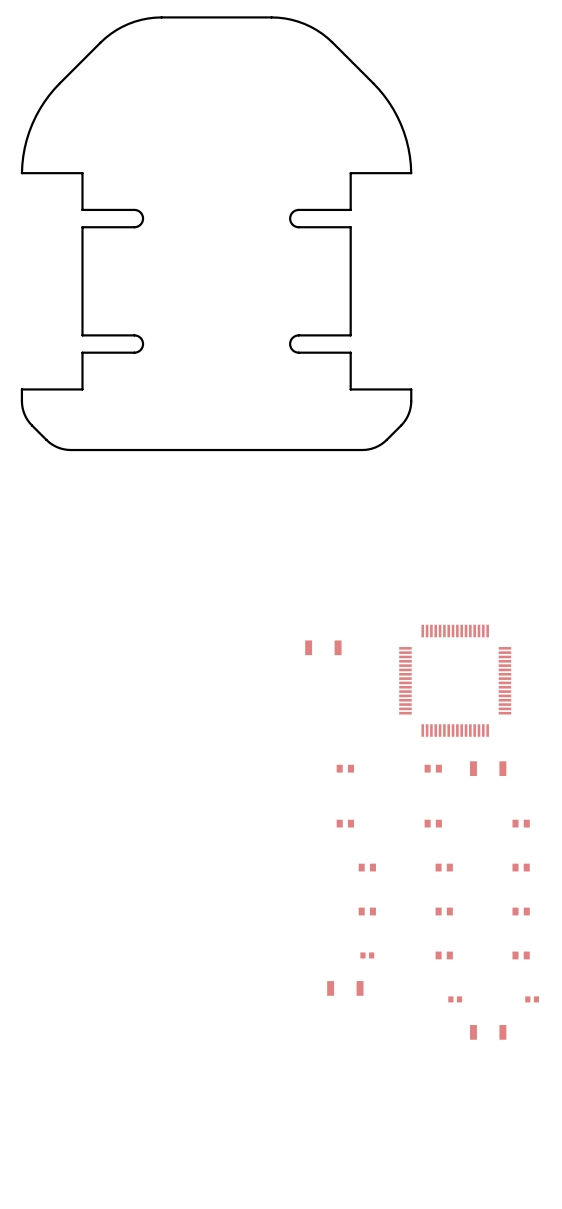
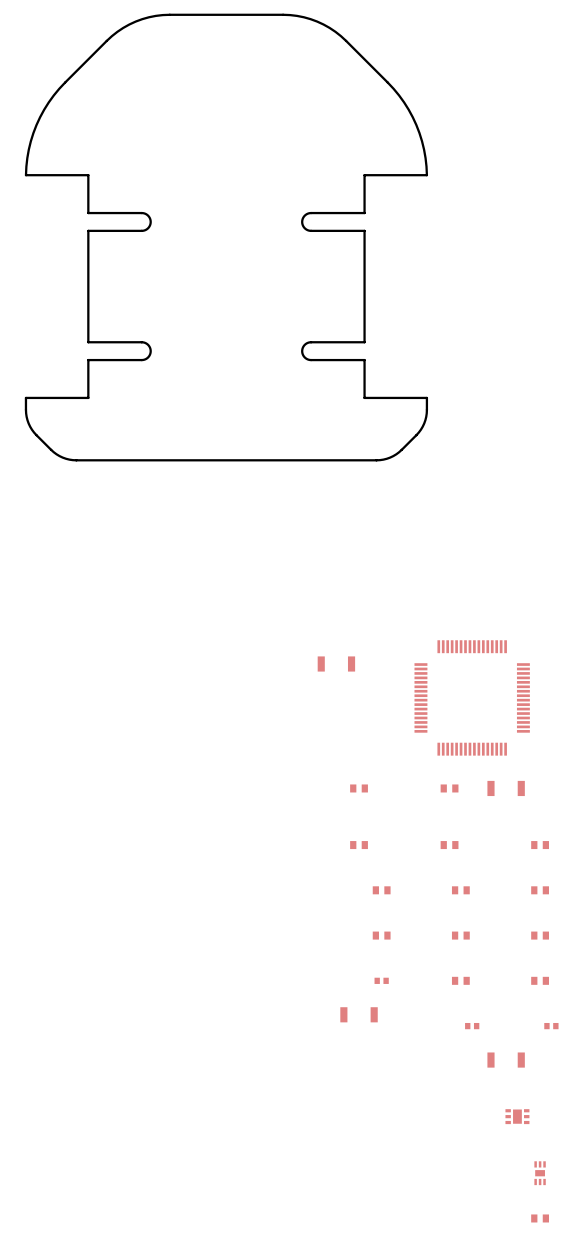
part: none -> (517, 1116)
part: none -> (540, 1173)
part: none -> (540, 1218)

